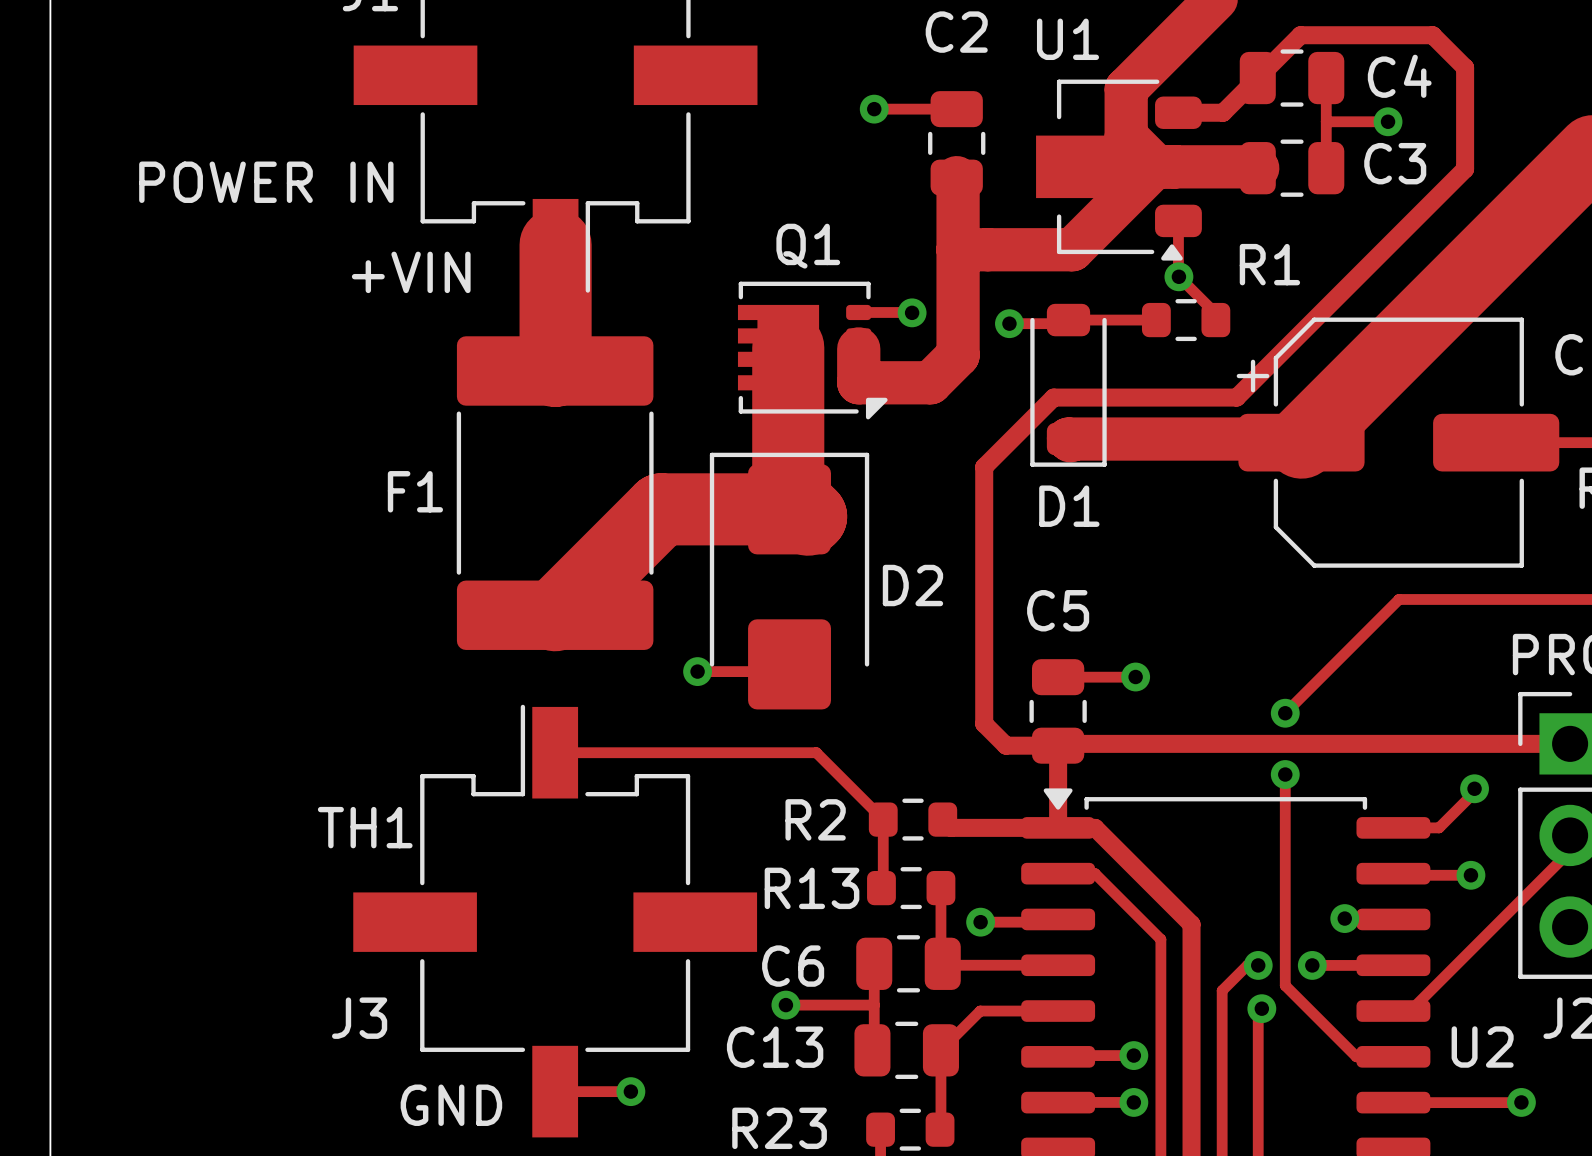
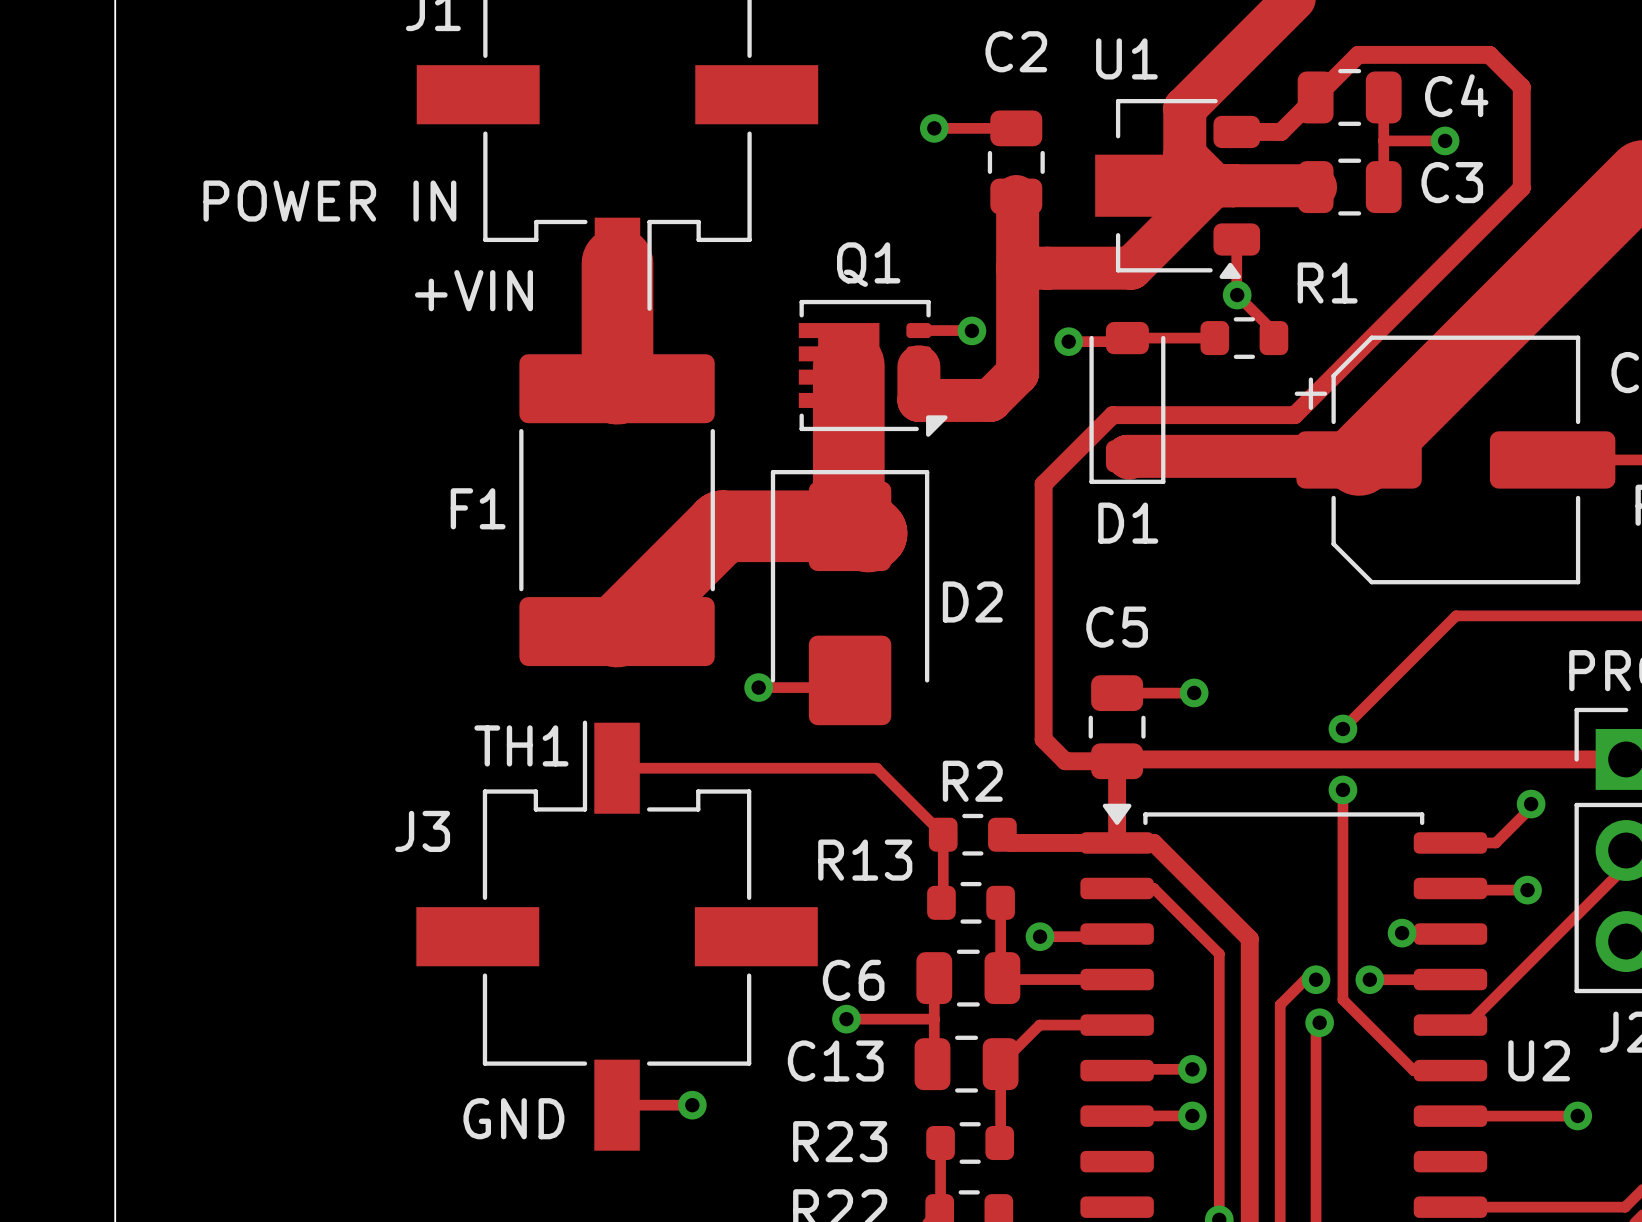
R2 name position: R2 (815, 819) -> R2 (972, 781)
text position: TH1 (365, 827) -> TH1 (521, 745)
R13 name position: R13 (812, 888) -> R13 (865, 860)
J3 name position: J3 (359, 1018) -> J3 (422, 831)

